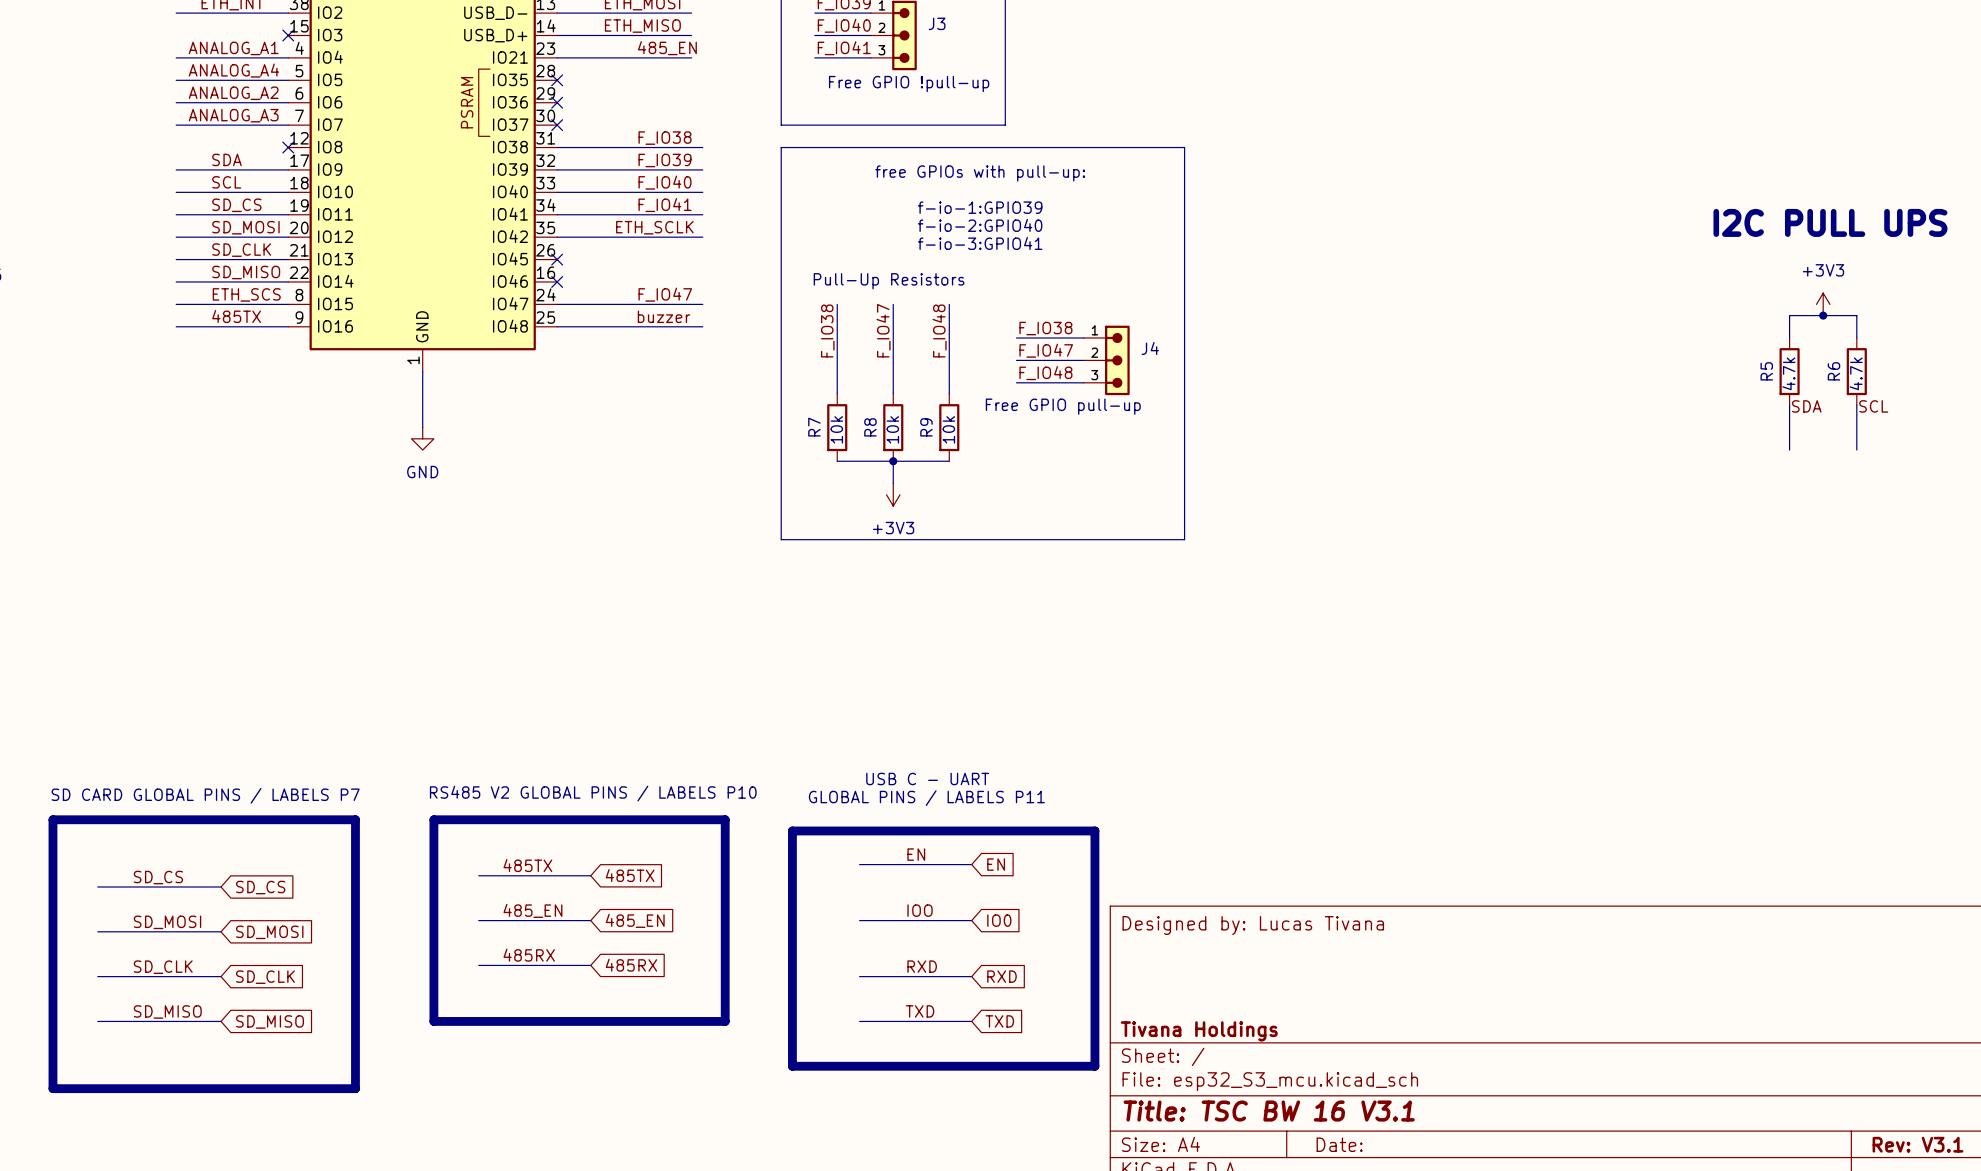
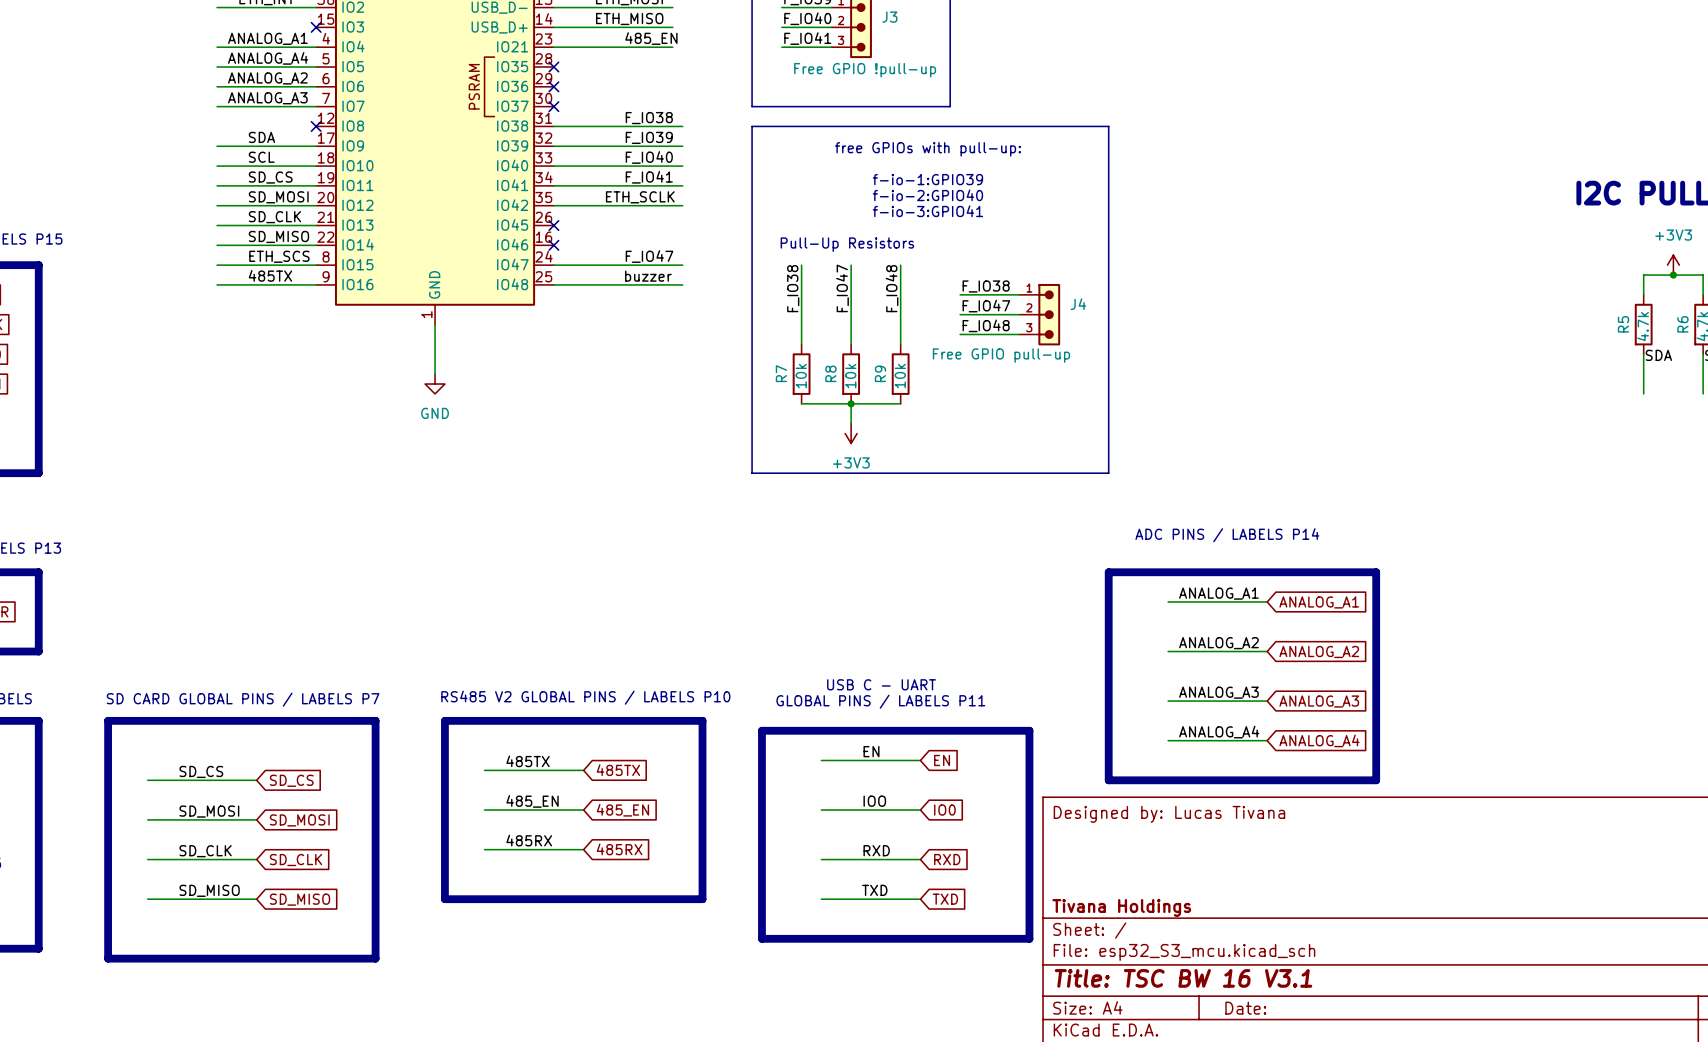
text: none -> ADC PINS / LABELS P14 (1227, 535)
line: none -> (1108, 572) (1376, 572) (1376, 780) (1108, 780) (1108, 572)
label: none -> ANALOG_A1 (1218, 593)
wire: none -> (1168, 601) (1267, 601)
global label: none -> ANALOG_A1 (1319, 602)
label: none -> ANALOG_A2 (1218, 643)
wire: none -> (1168, 651) (1267, 651)
global label: none -> ANALOG_A2 (1319, 651)
label: none -> ANALOG_A3 (1218, 692)
wire: none -> (1168, 701) (1267, 701)
global label: none -> ANALOG_A3 (1319, 701)
label: none -> ANALOG_A4 (1219, 732)
wire: none -> (1168, 740) (1267, 740)
global label: none -> ANALOG_A4 (1319, 740)

